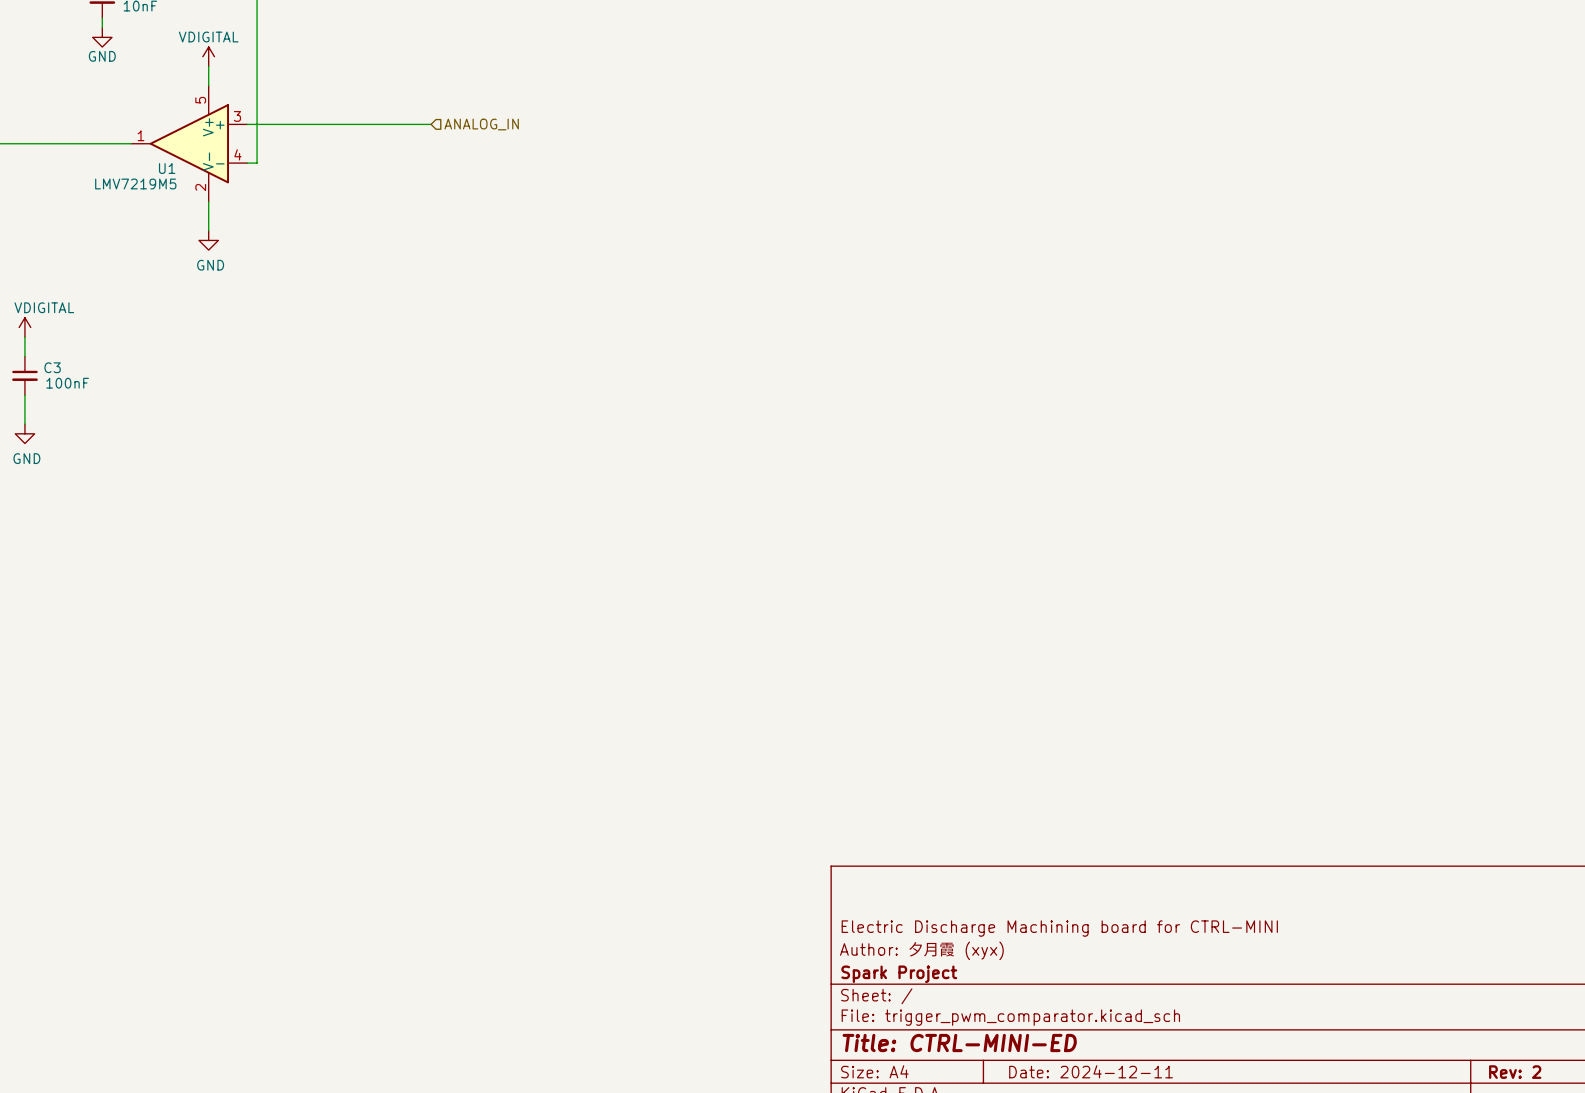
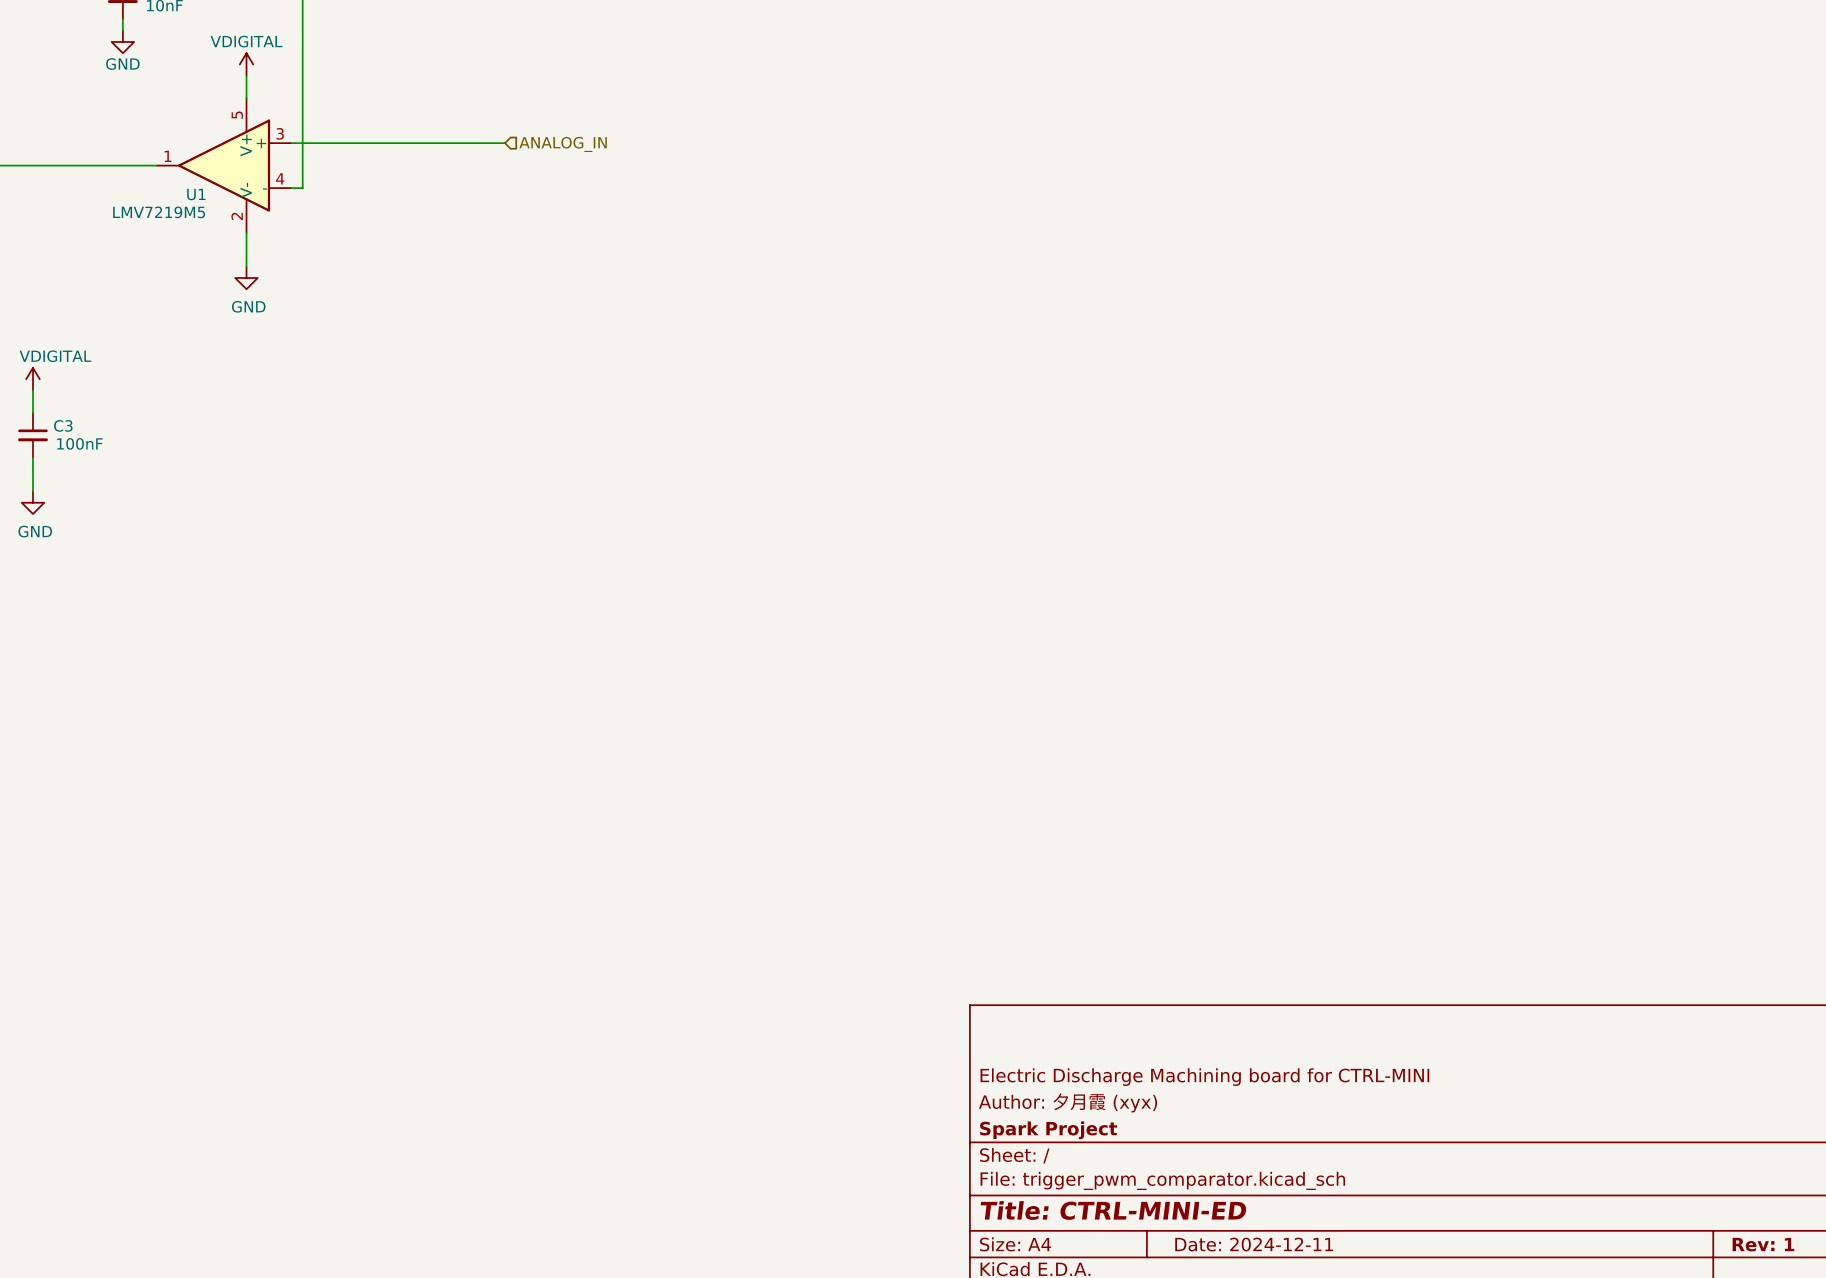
title block: Rev: 2 (1515, 1072) -> Rev: 1 (1763, 1244)

